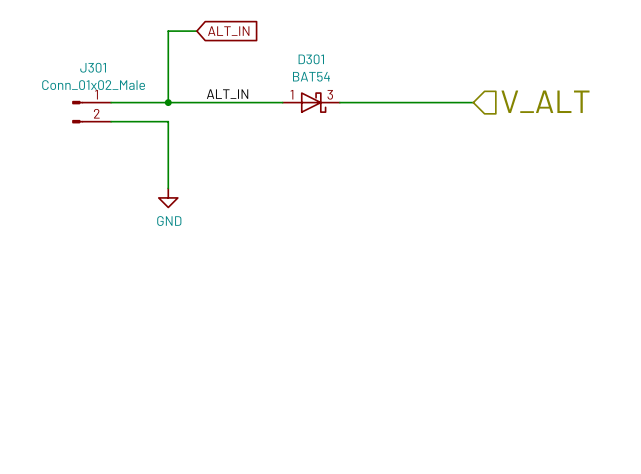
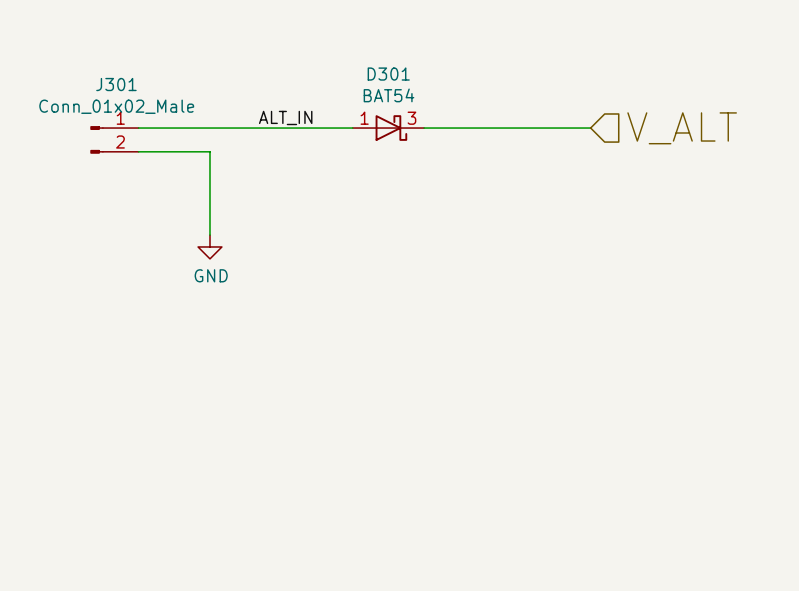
wire: (196, 31) (168, 31) (168, 102) -> none
global label: ALT_IN (228, 31) -> none
junction: (168, 102) -> none

